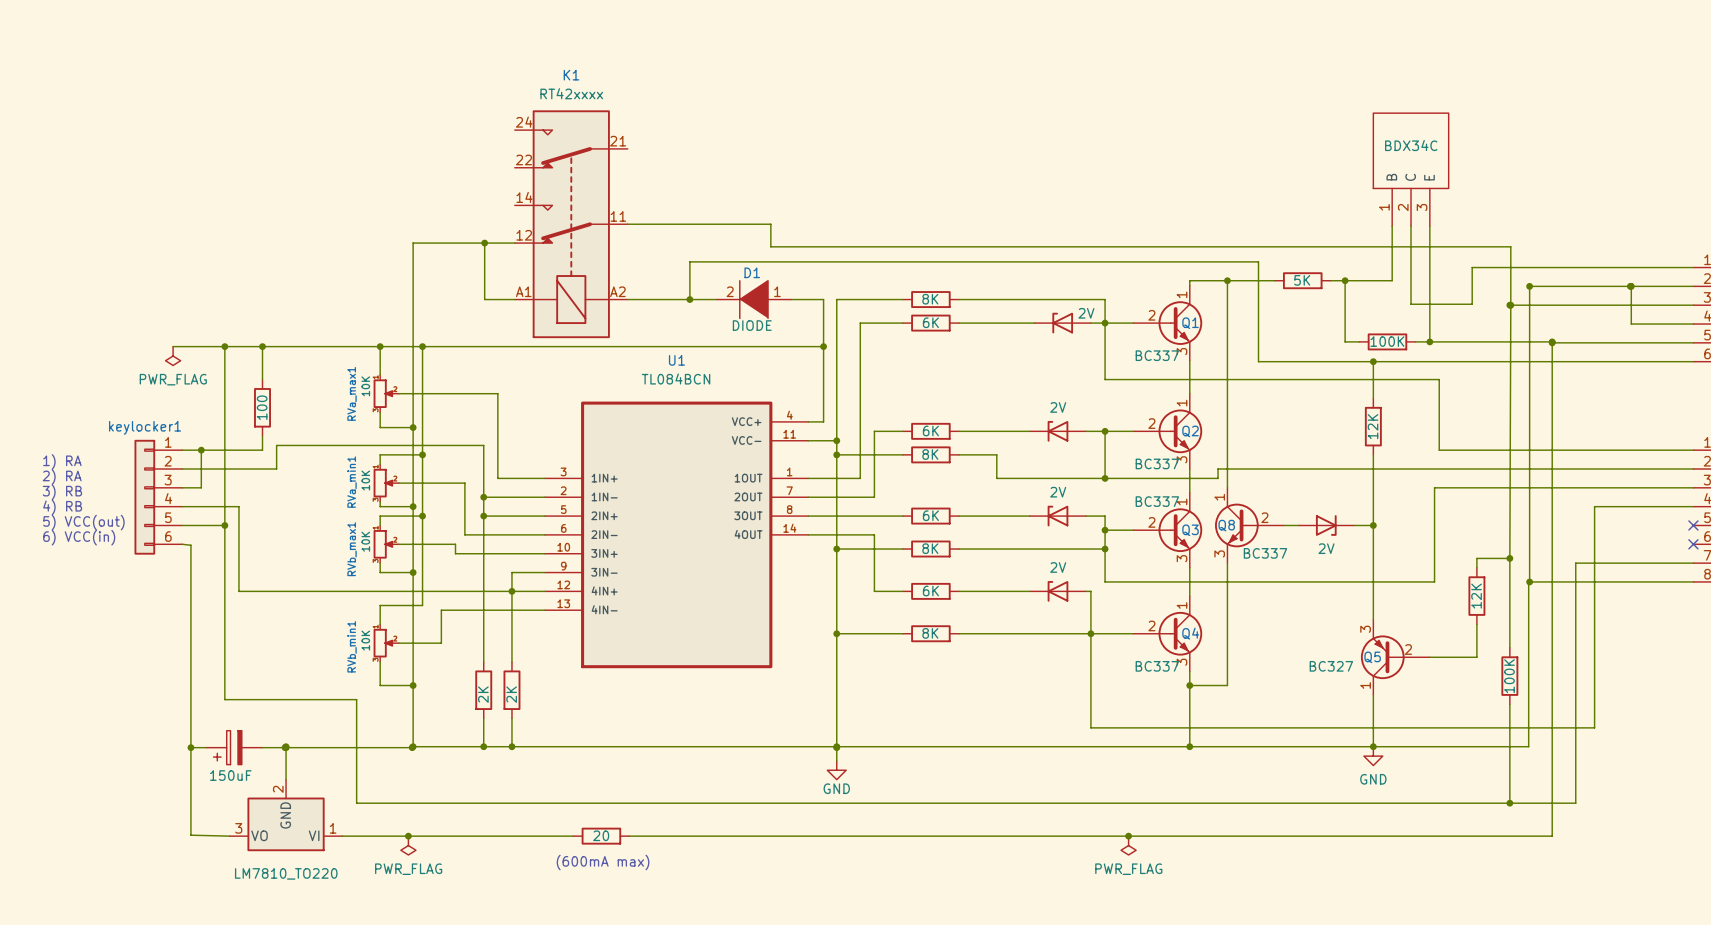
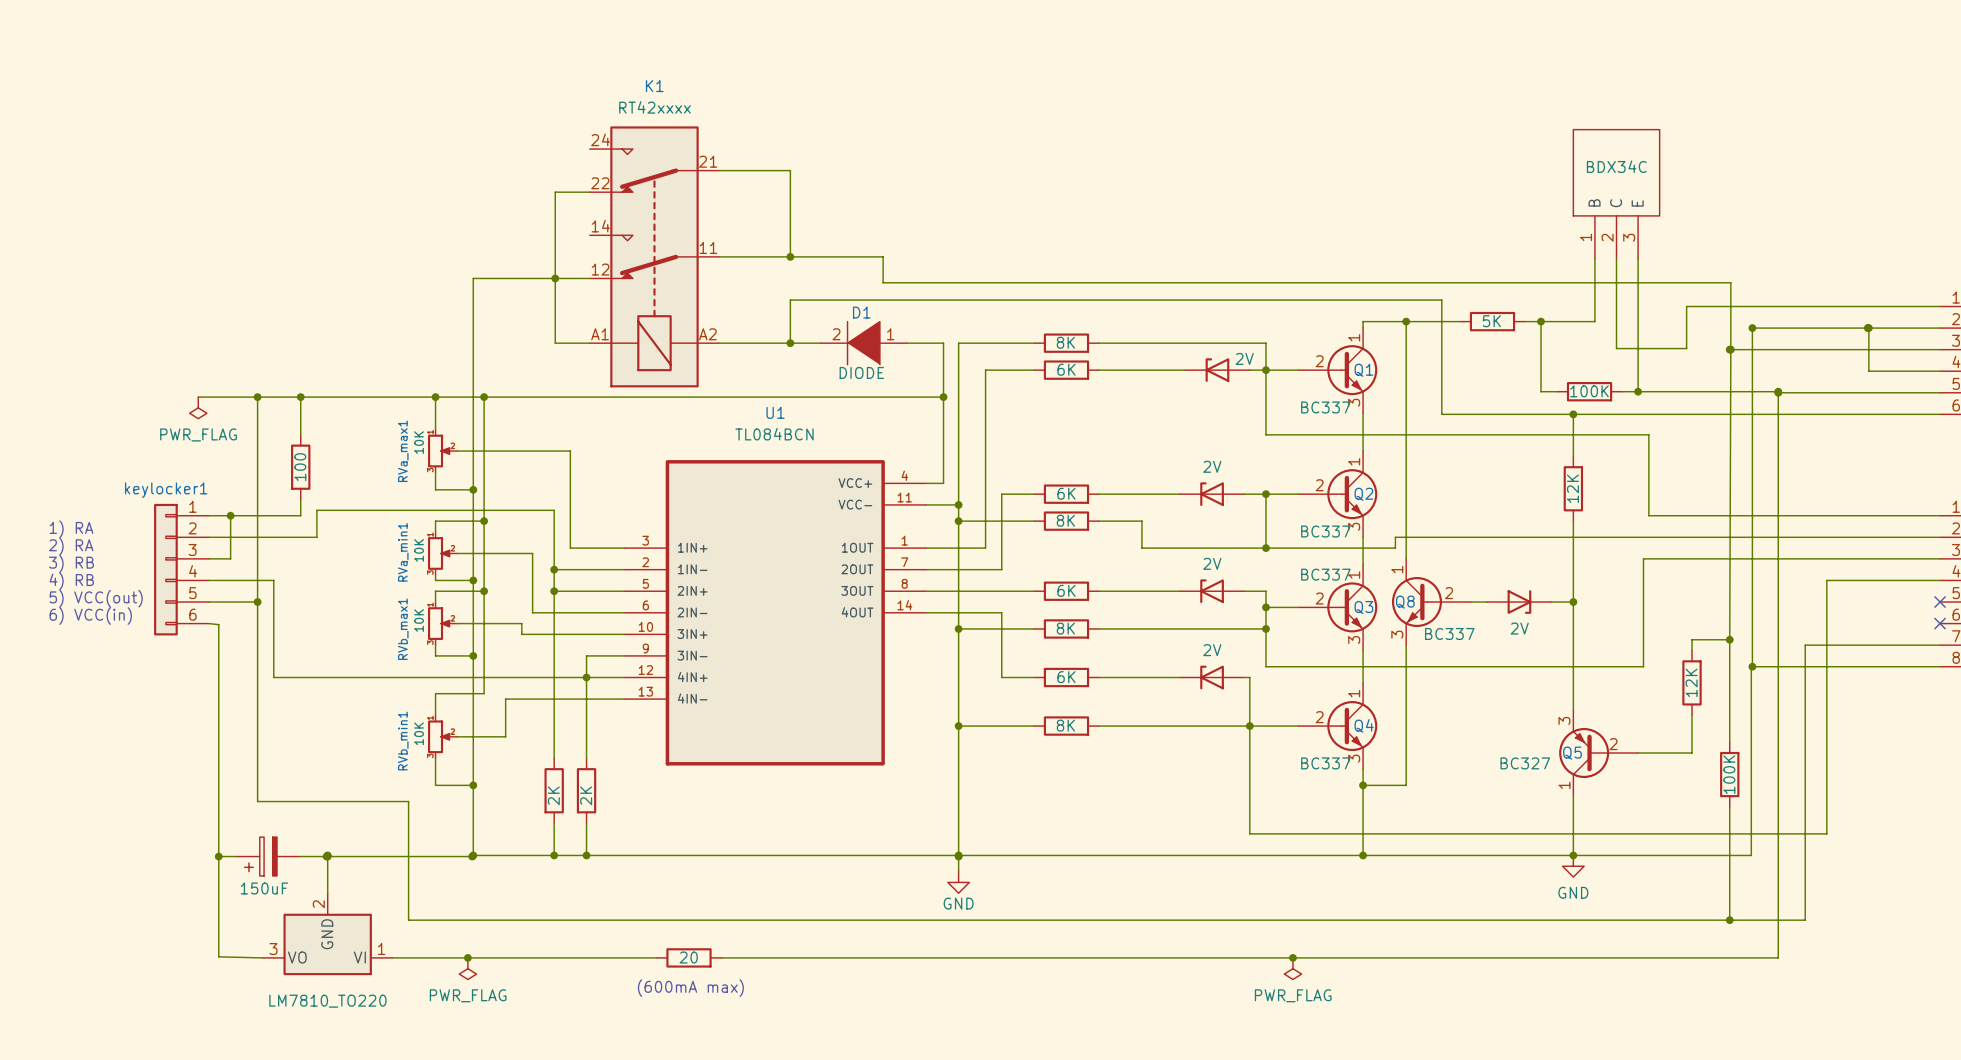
wire: none -> (719, 170) (790, 170) (790, 256)
wire: none -> (589, 192) (555, 192) (555, 278)
junction: none -> (790, 256)

